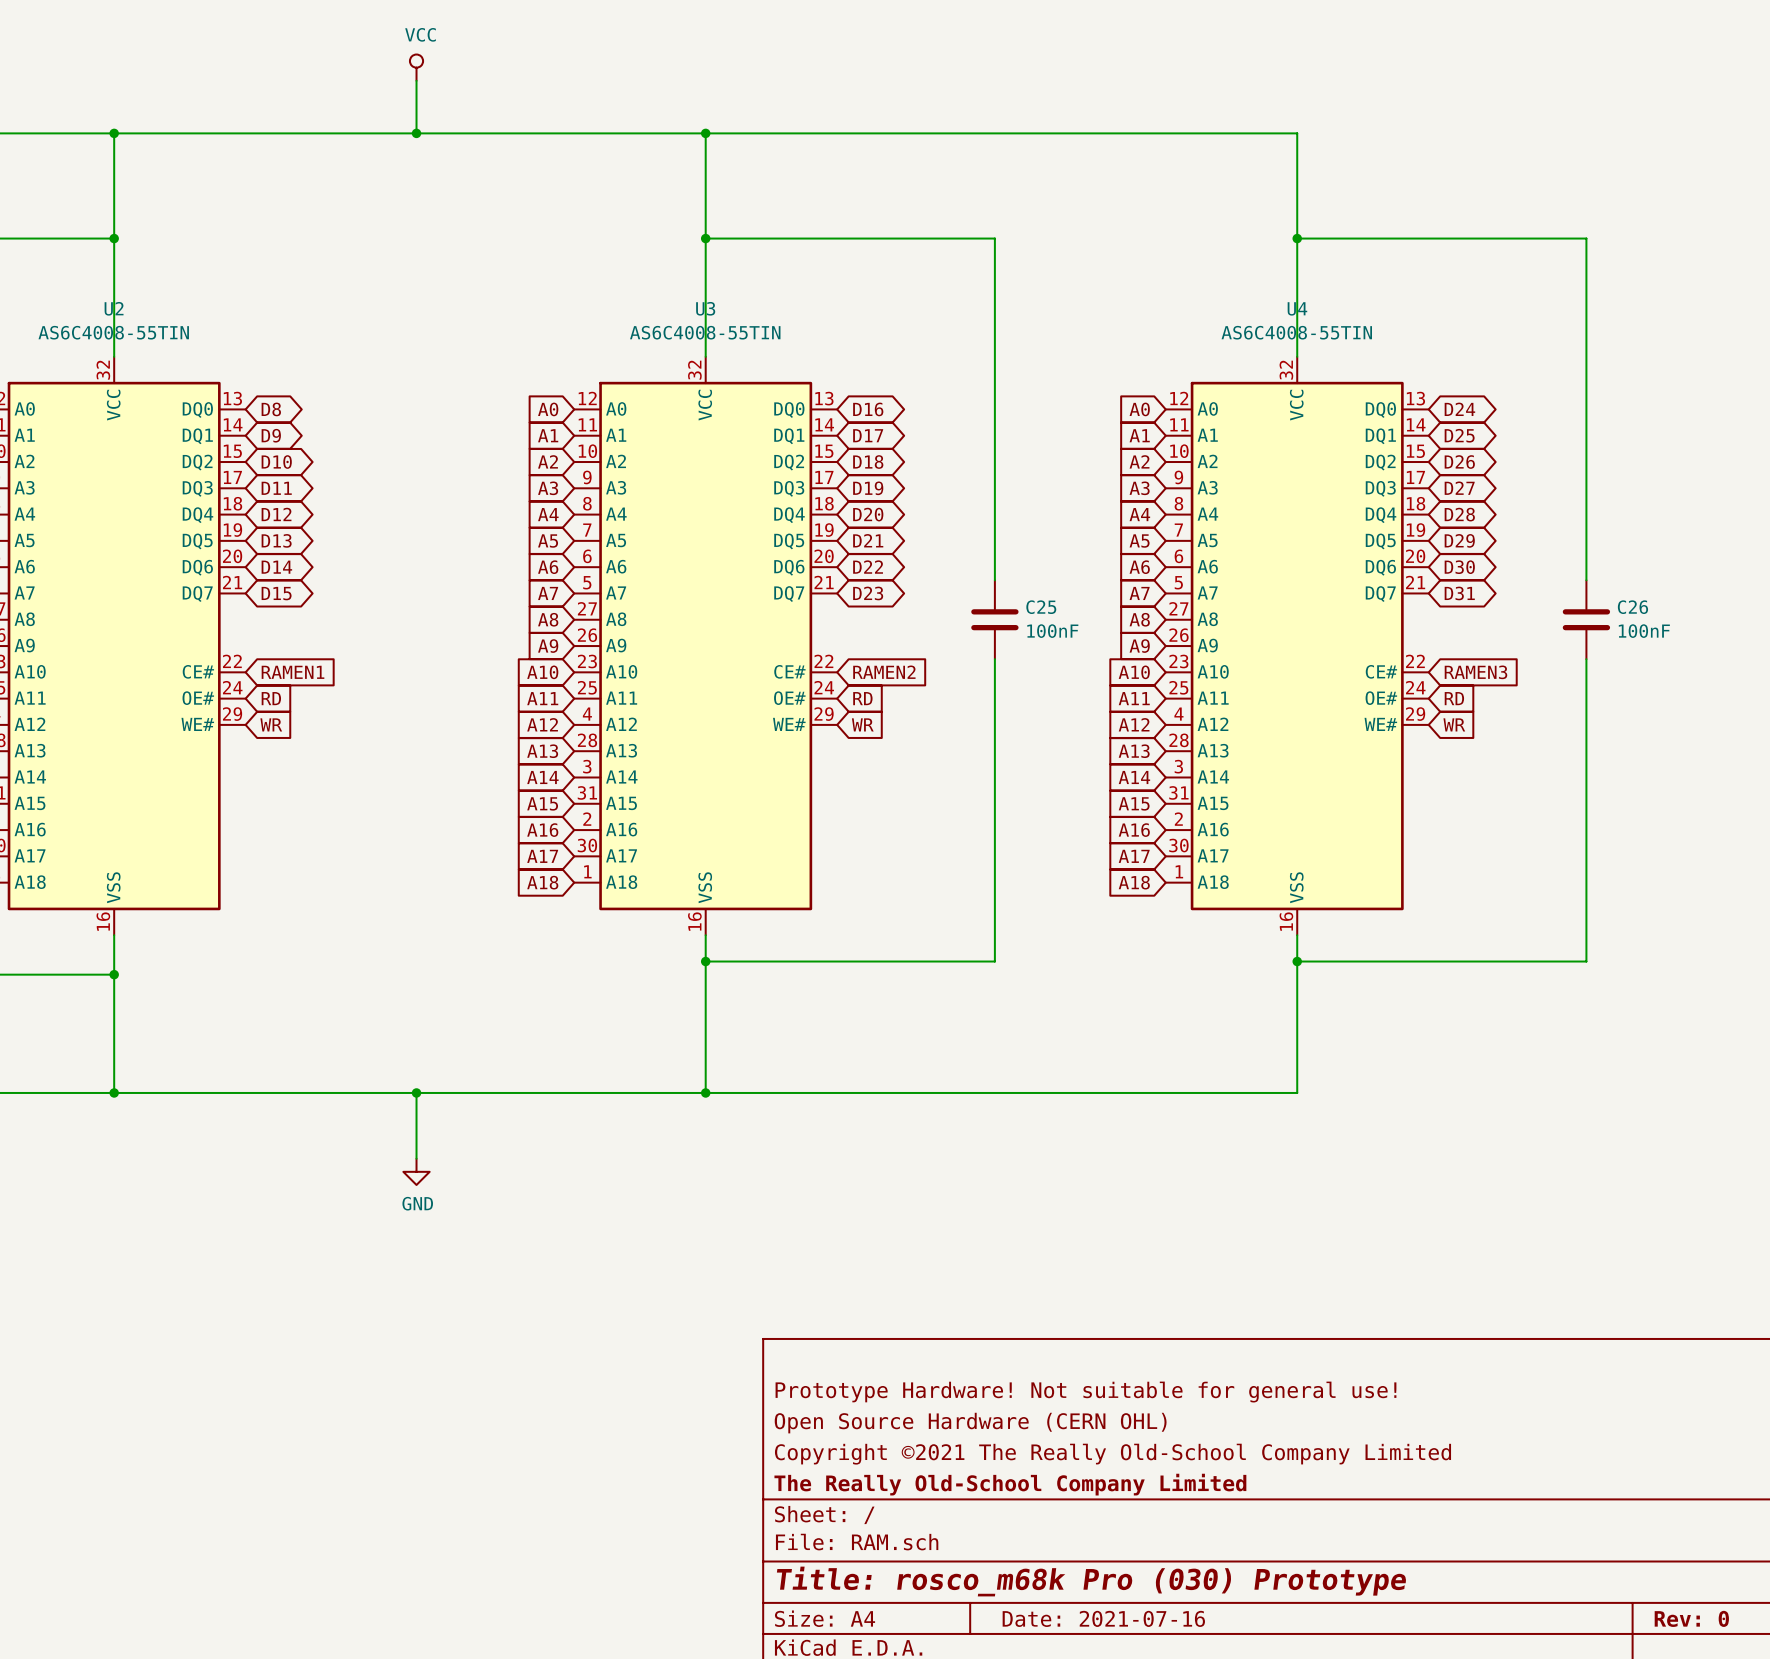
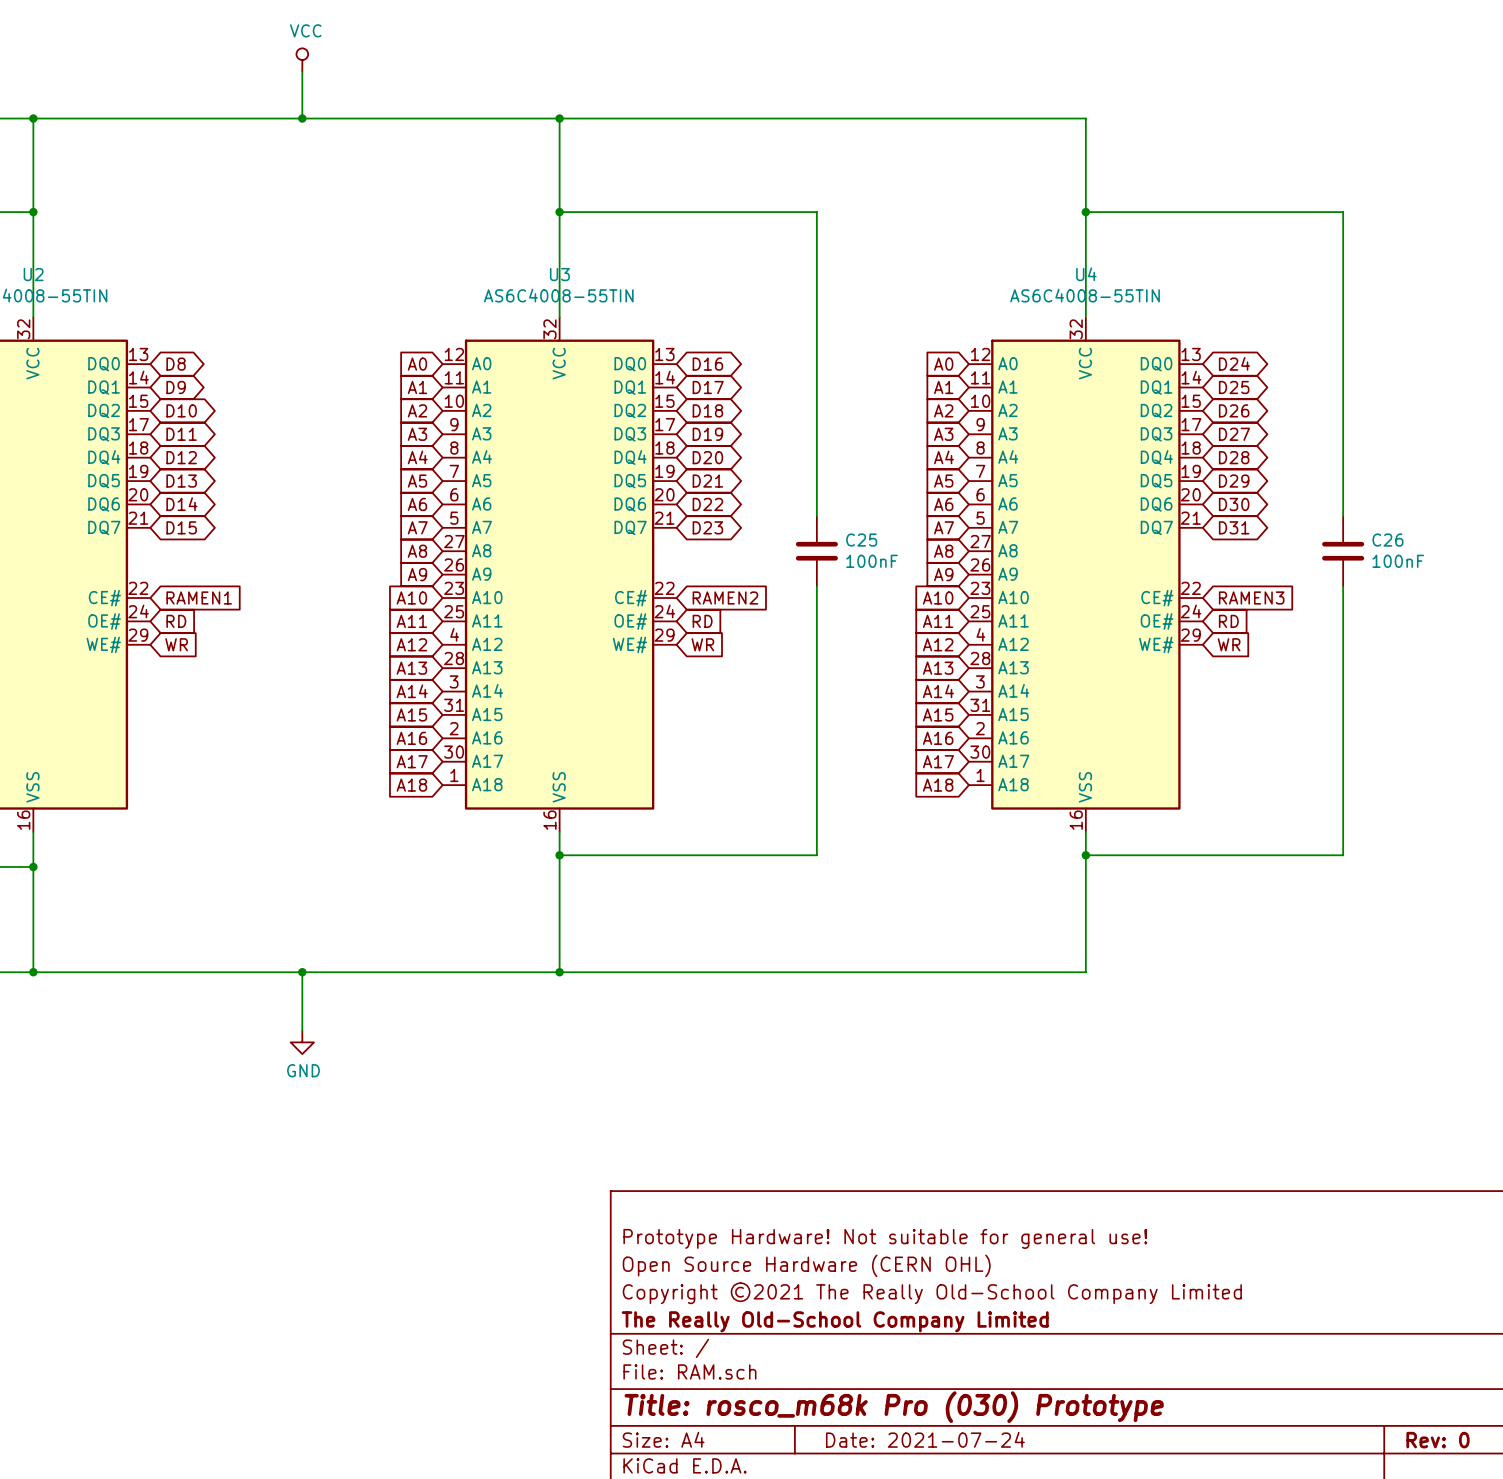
title block: Date: 2021-07-16 (1103, 1618) -> Date: 2021-07-24 (925, 1439)

